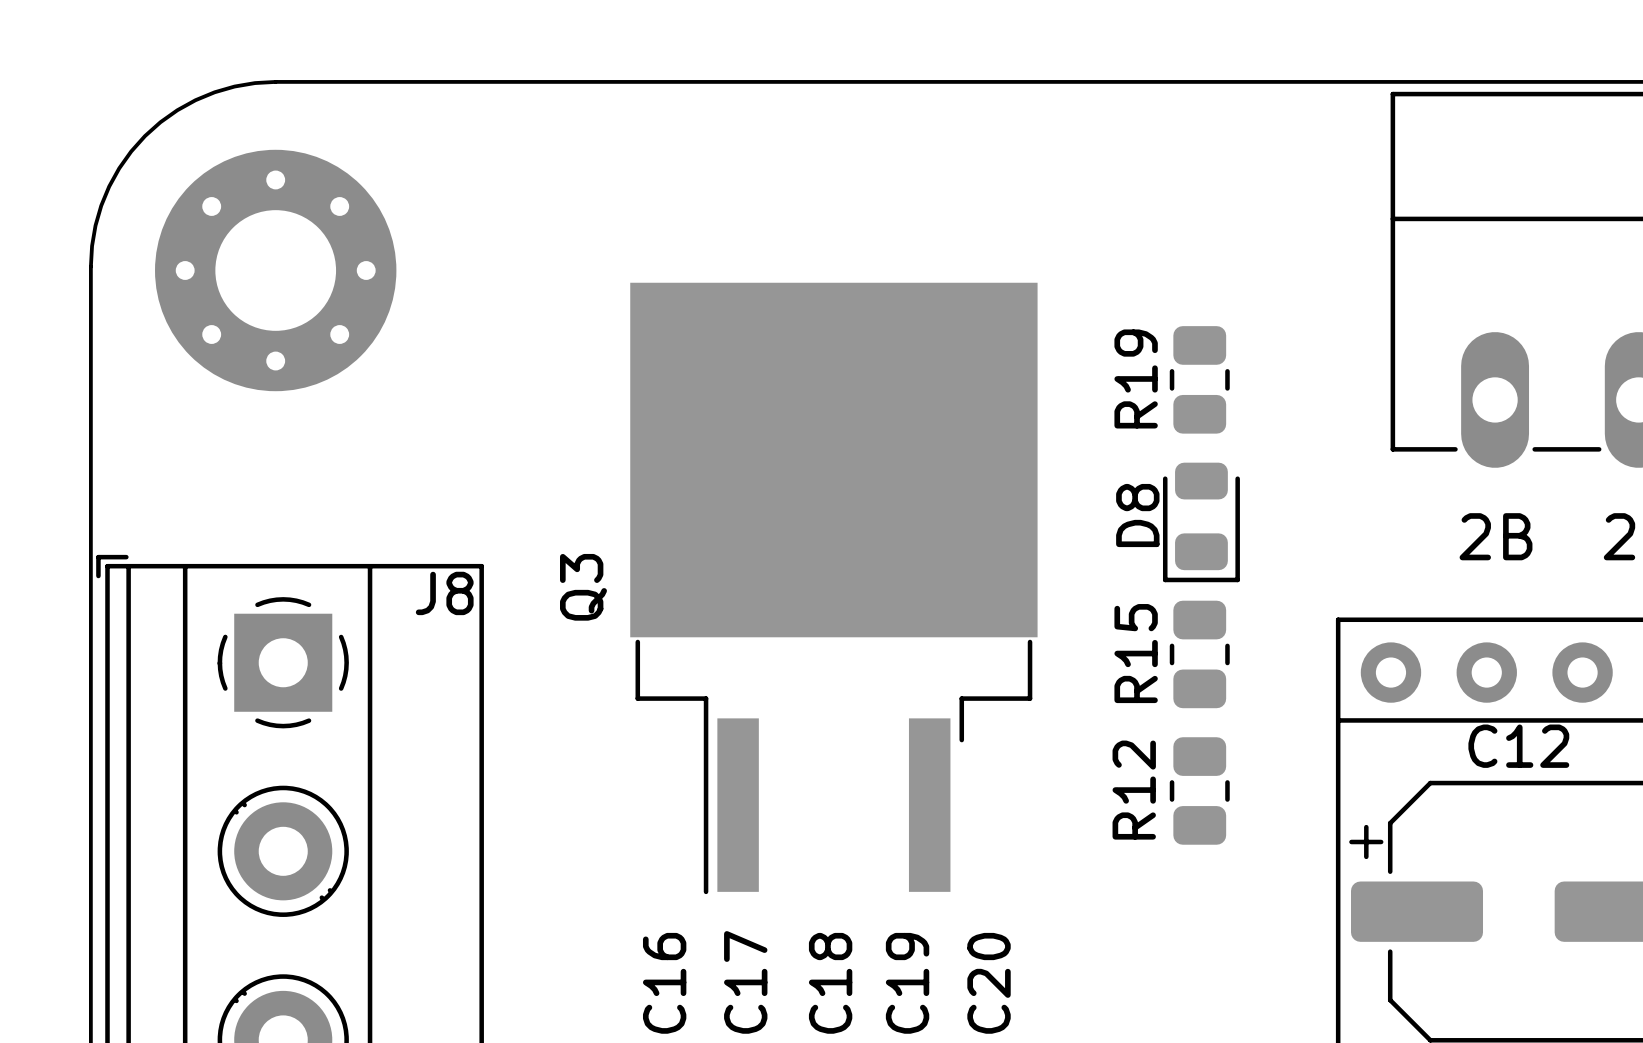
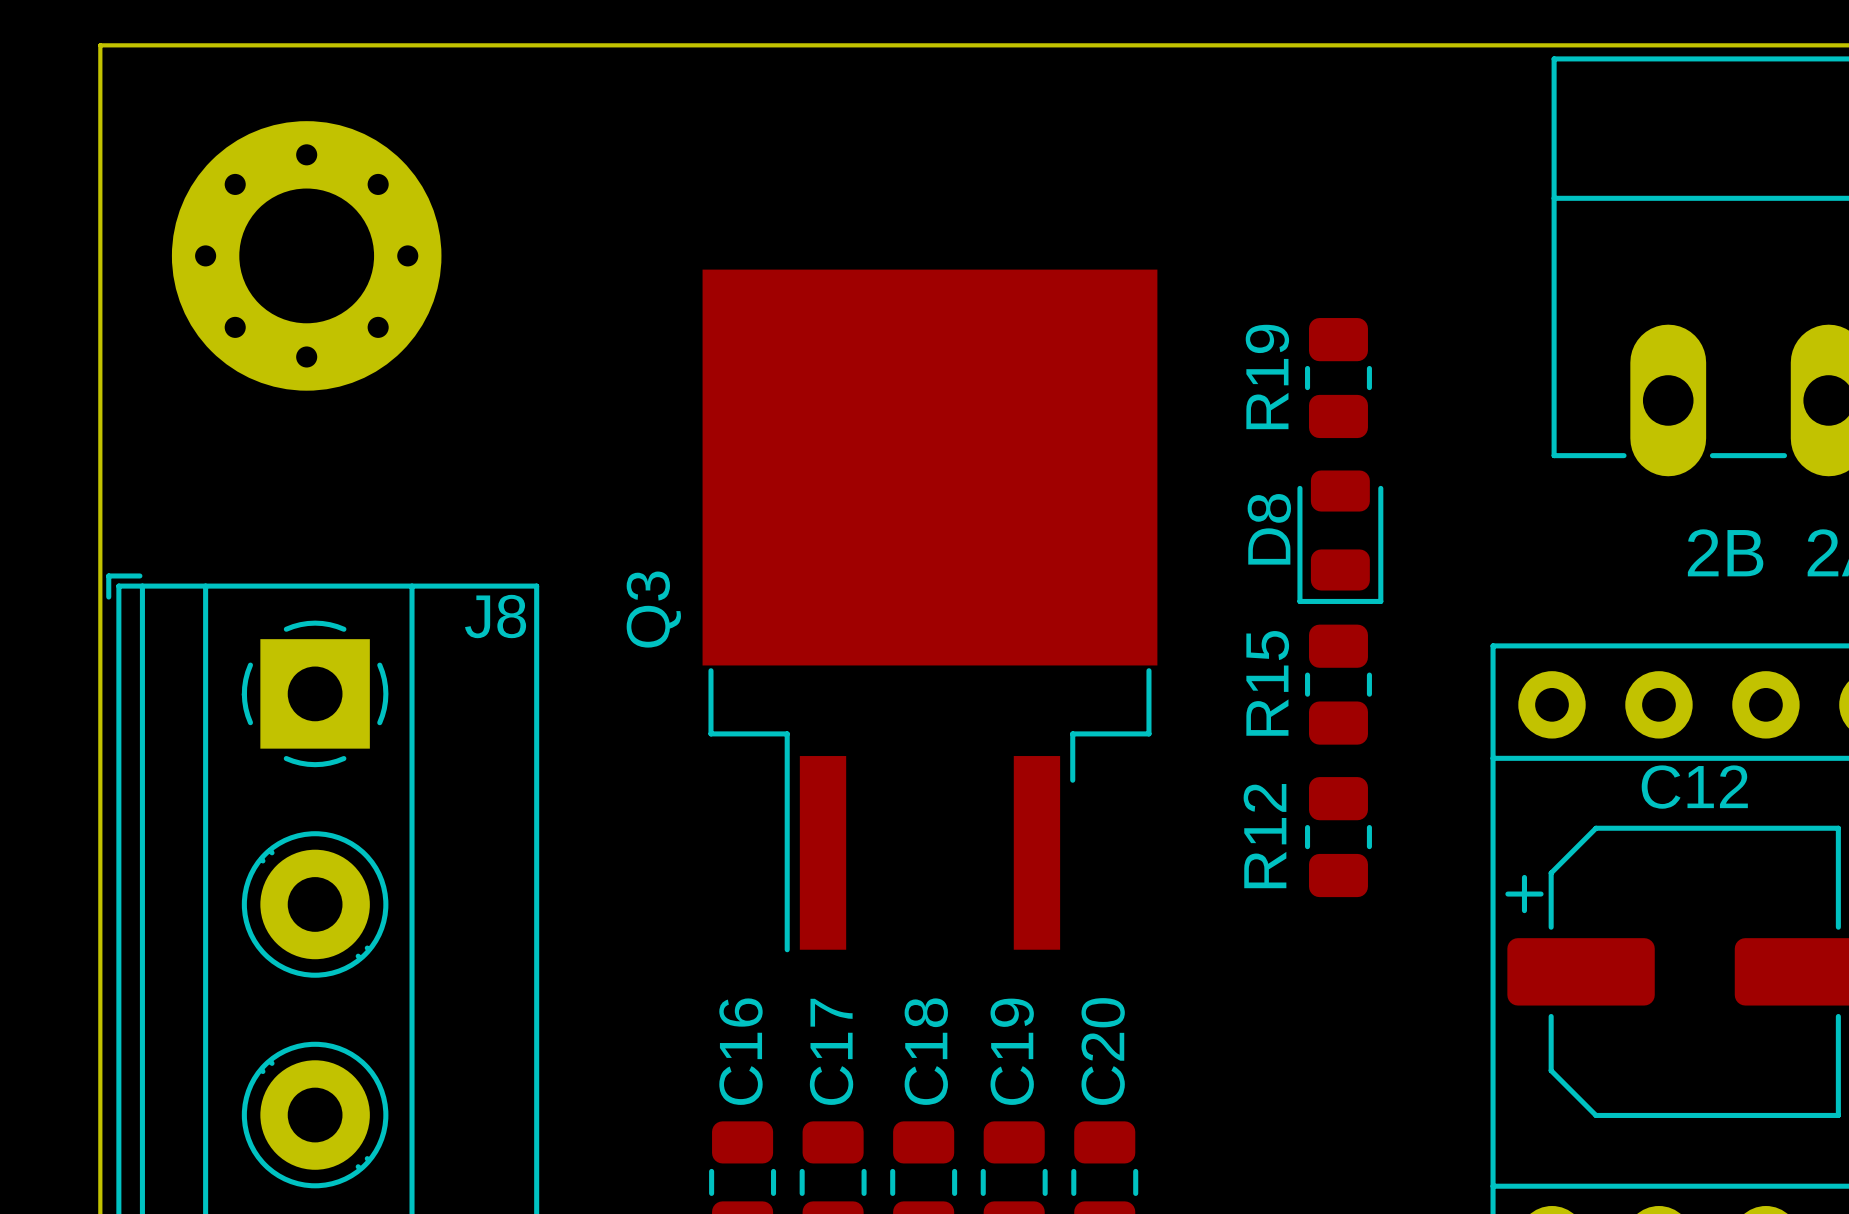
board edge: (275, 81) (255, 83) (214, 92) (177, 110) (145, 136) (119, 168) (109, 186) (95, 225) (90, 266) -> (306, 45) (100, 45) (100, 251)

